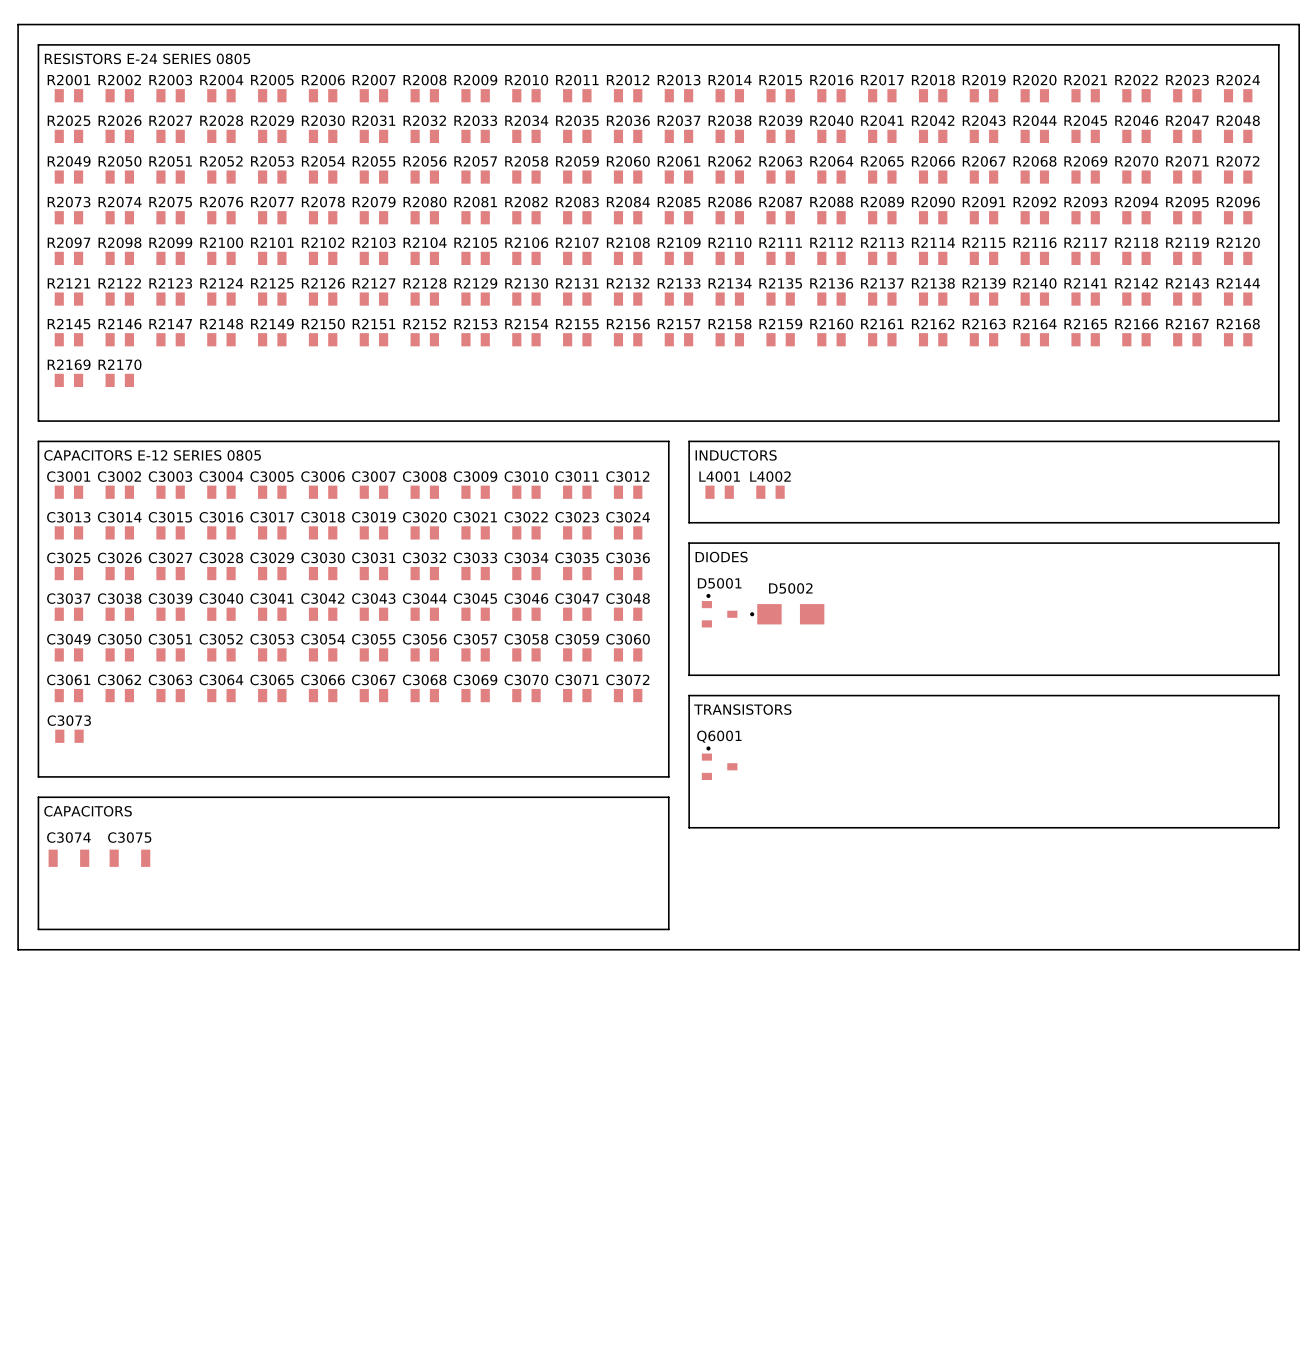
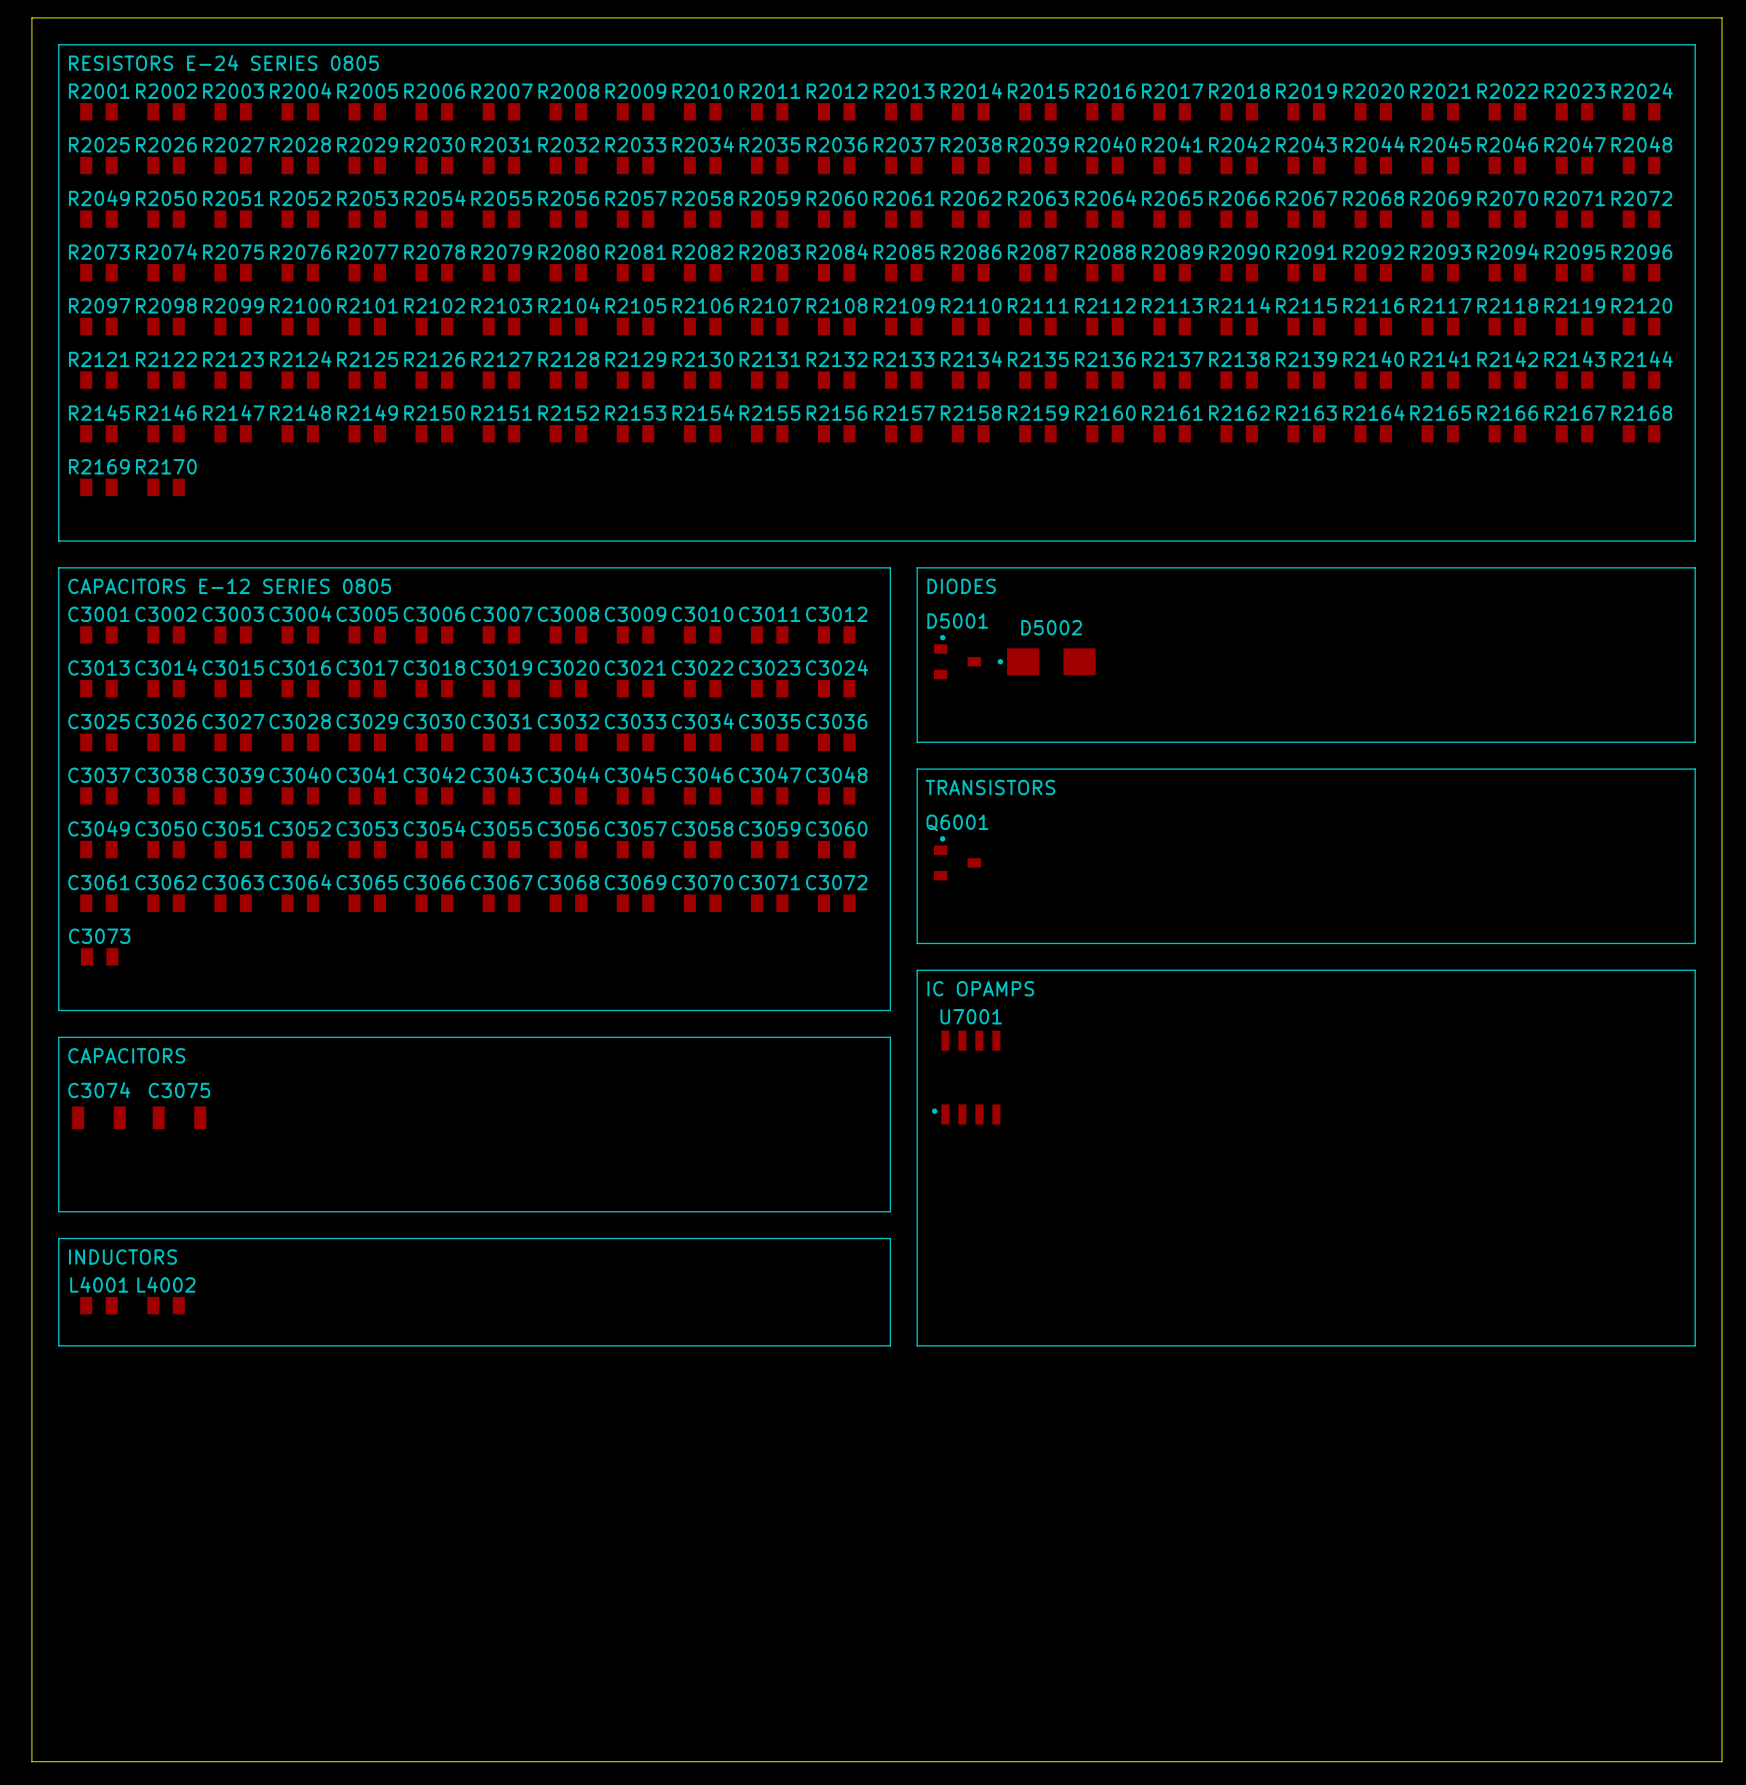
text: INDUCTORS (736, 455) -> DIODES (961, 586)
L4001 position: (719, 492) -> (98, 1305)
L4002 position: (770, 492) -> (166, 1305)
line: (689, 522) (1278, 522) -> (917, 675) (917, 702)
line: (689, 543) (1278, 543) -> (1695, 675) (1695, 702)
text: DIODES (721, 557) -> none
line: (689, 573) (689, 593) -> (917, 742) (1695, 742)
line: (1278, 573) (1278, 593) -> (917, 769) (1695, 769)
D5001 position: (719, 610) -> (957, 657)
D5002 position: (787, 614) -> (1046, 661)
line: (689, 675) (1278, 675) -> (917, 876) (917, 903)
line: (689, 695) (1278, 695) -> (1695, 876) (1695, 903)
text position: TRANSISTORS (742, 709) -> TRANSISTORS (990, 787)
line: (689, 726) (689, 746) -> (917, 943) (1695, 943)
line: (1278, 726) (1278, 746) -> (917, 970) (1695, 970)
text: none -> IC OPAMPS (980, 988)
Q6001 position: (719, 763) -> (957, 858)
line: (689, 827) (1278, 827) -> (917, 1077) (917, 1345) (1695, 1345) (1695, 1077)
U7001: none -> (966, 1077)
board edge: (18, 949) (1299, 949) -> (31, 1238) (31, 1761) (1722, 1761) (1722, 1238)
line: none -> (58, 1238) (58, 1345) (890, 1345) (890, 1238) (58, 1238)
text: none -> INDUCTORS (122, 1257)

